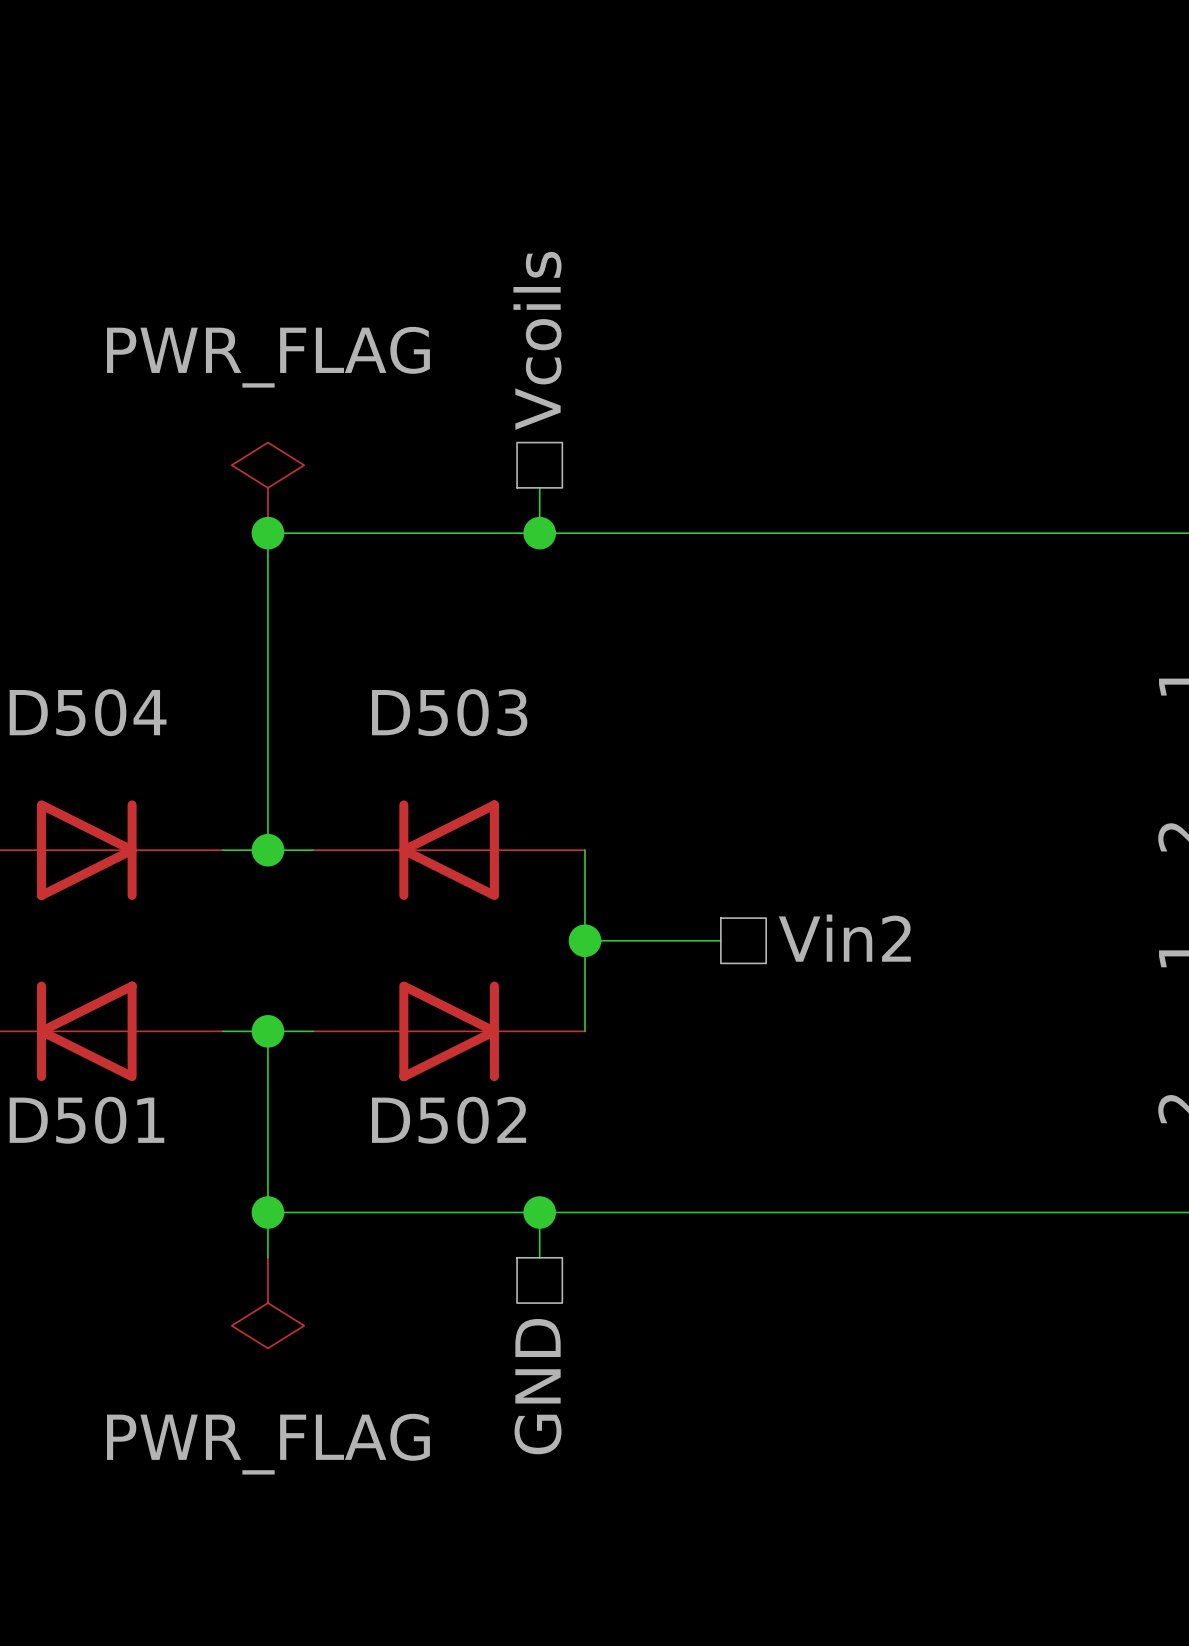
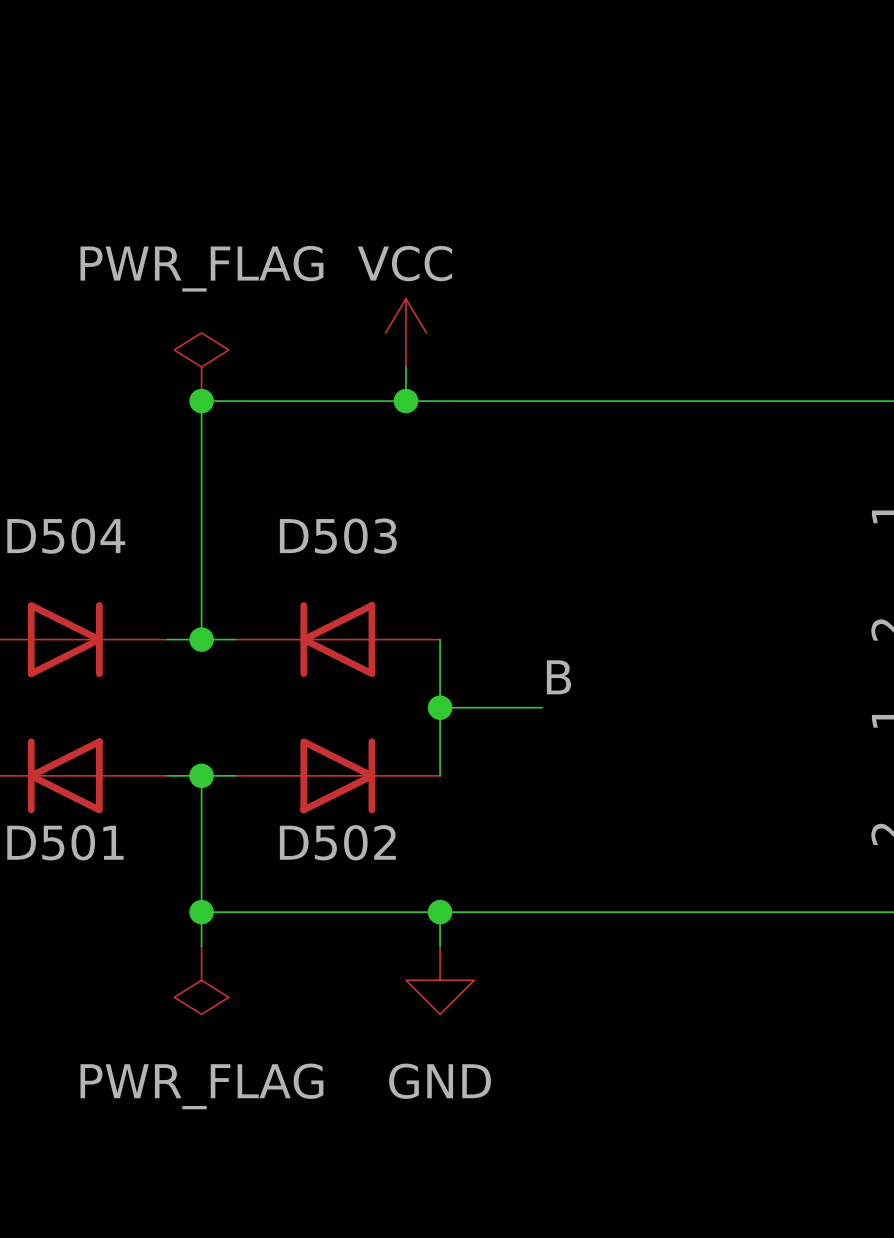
hierarchical label: Vcoils (537, 340) -> none
power symbol: none -> VCC (406, 332)
label: none -> B (558, 677)
hierarchical label: Vin2 (844, 938) -> none
wire: (539, 1212) (539, 1257) -> (440, 912) (440, 946)
junction position: (539, 1212) -> (440, 912)
power symbol: none -> GND (440, 980)
hierarchical label: GND (538, 1386) -> none

